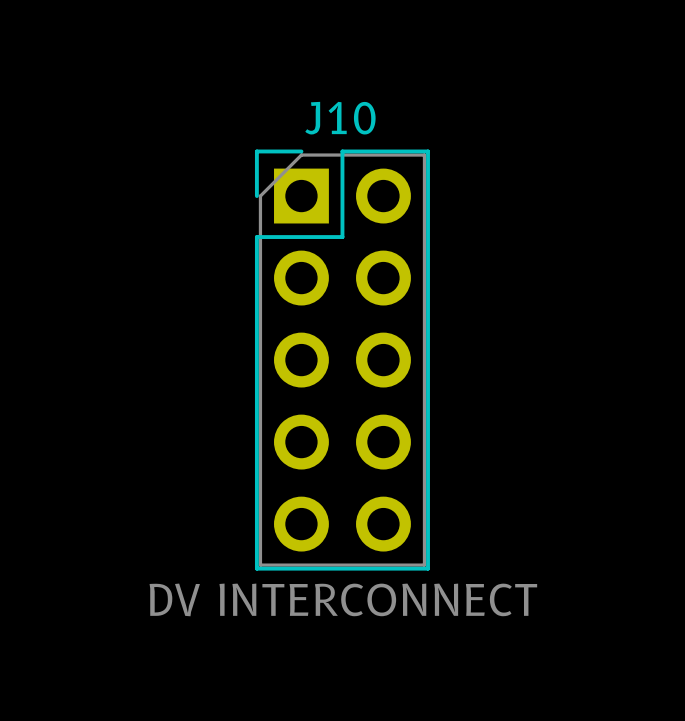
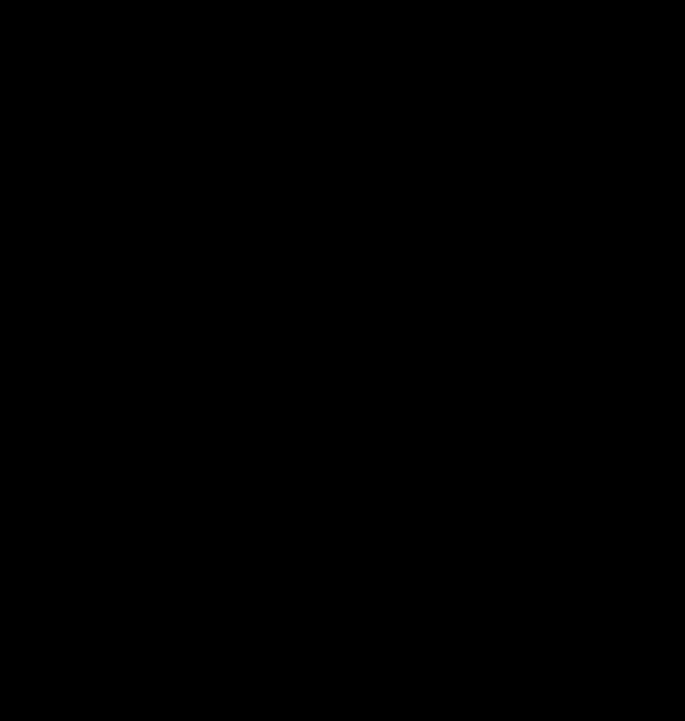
J10: DV INTERCONNECT (342, 360) -> none

